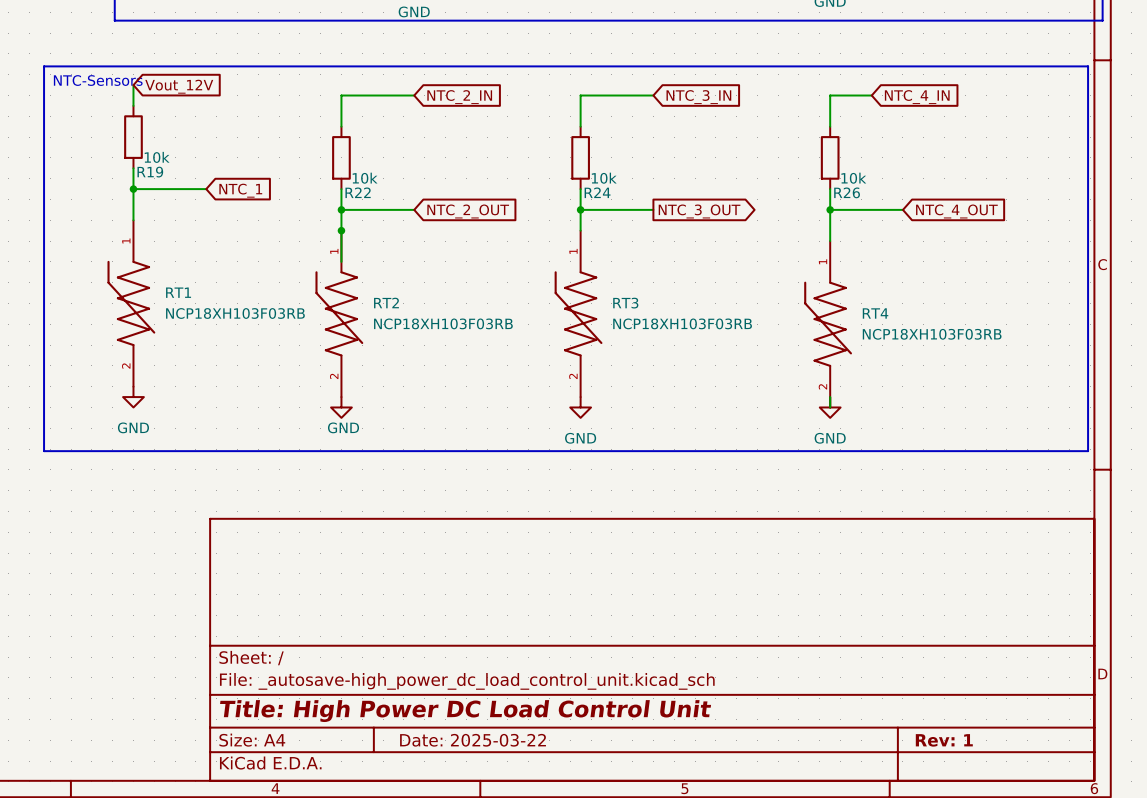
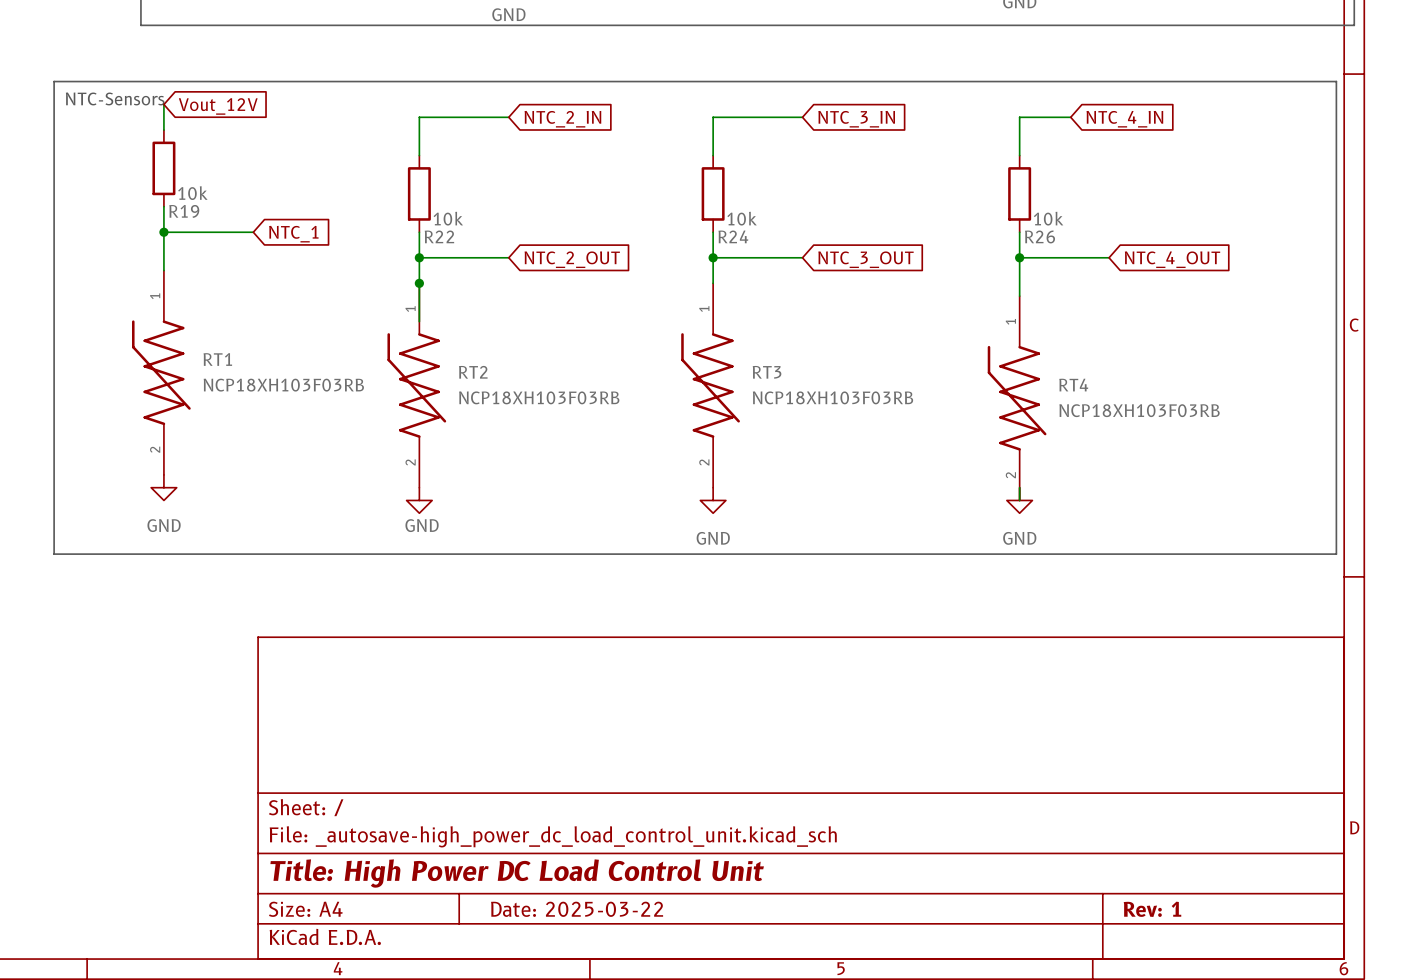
global label shape: output (699, 211) -> input (865, 259)

